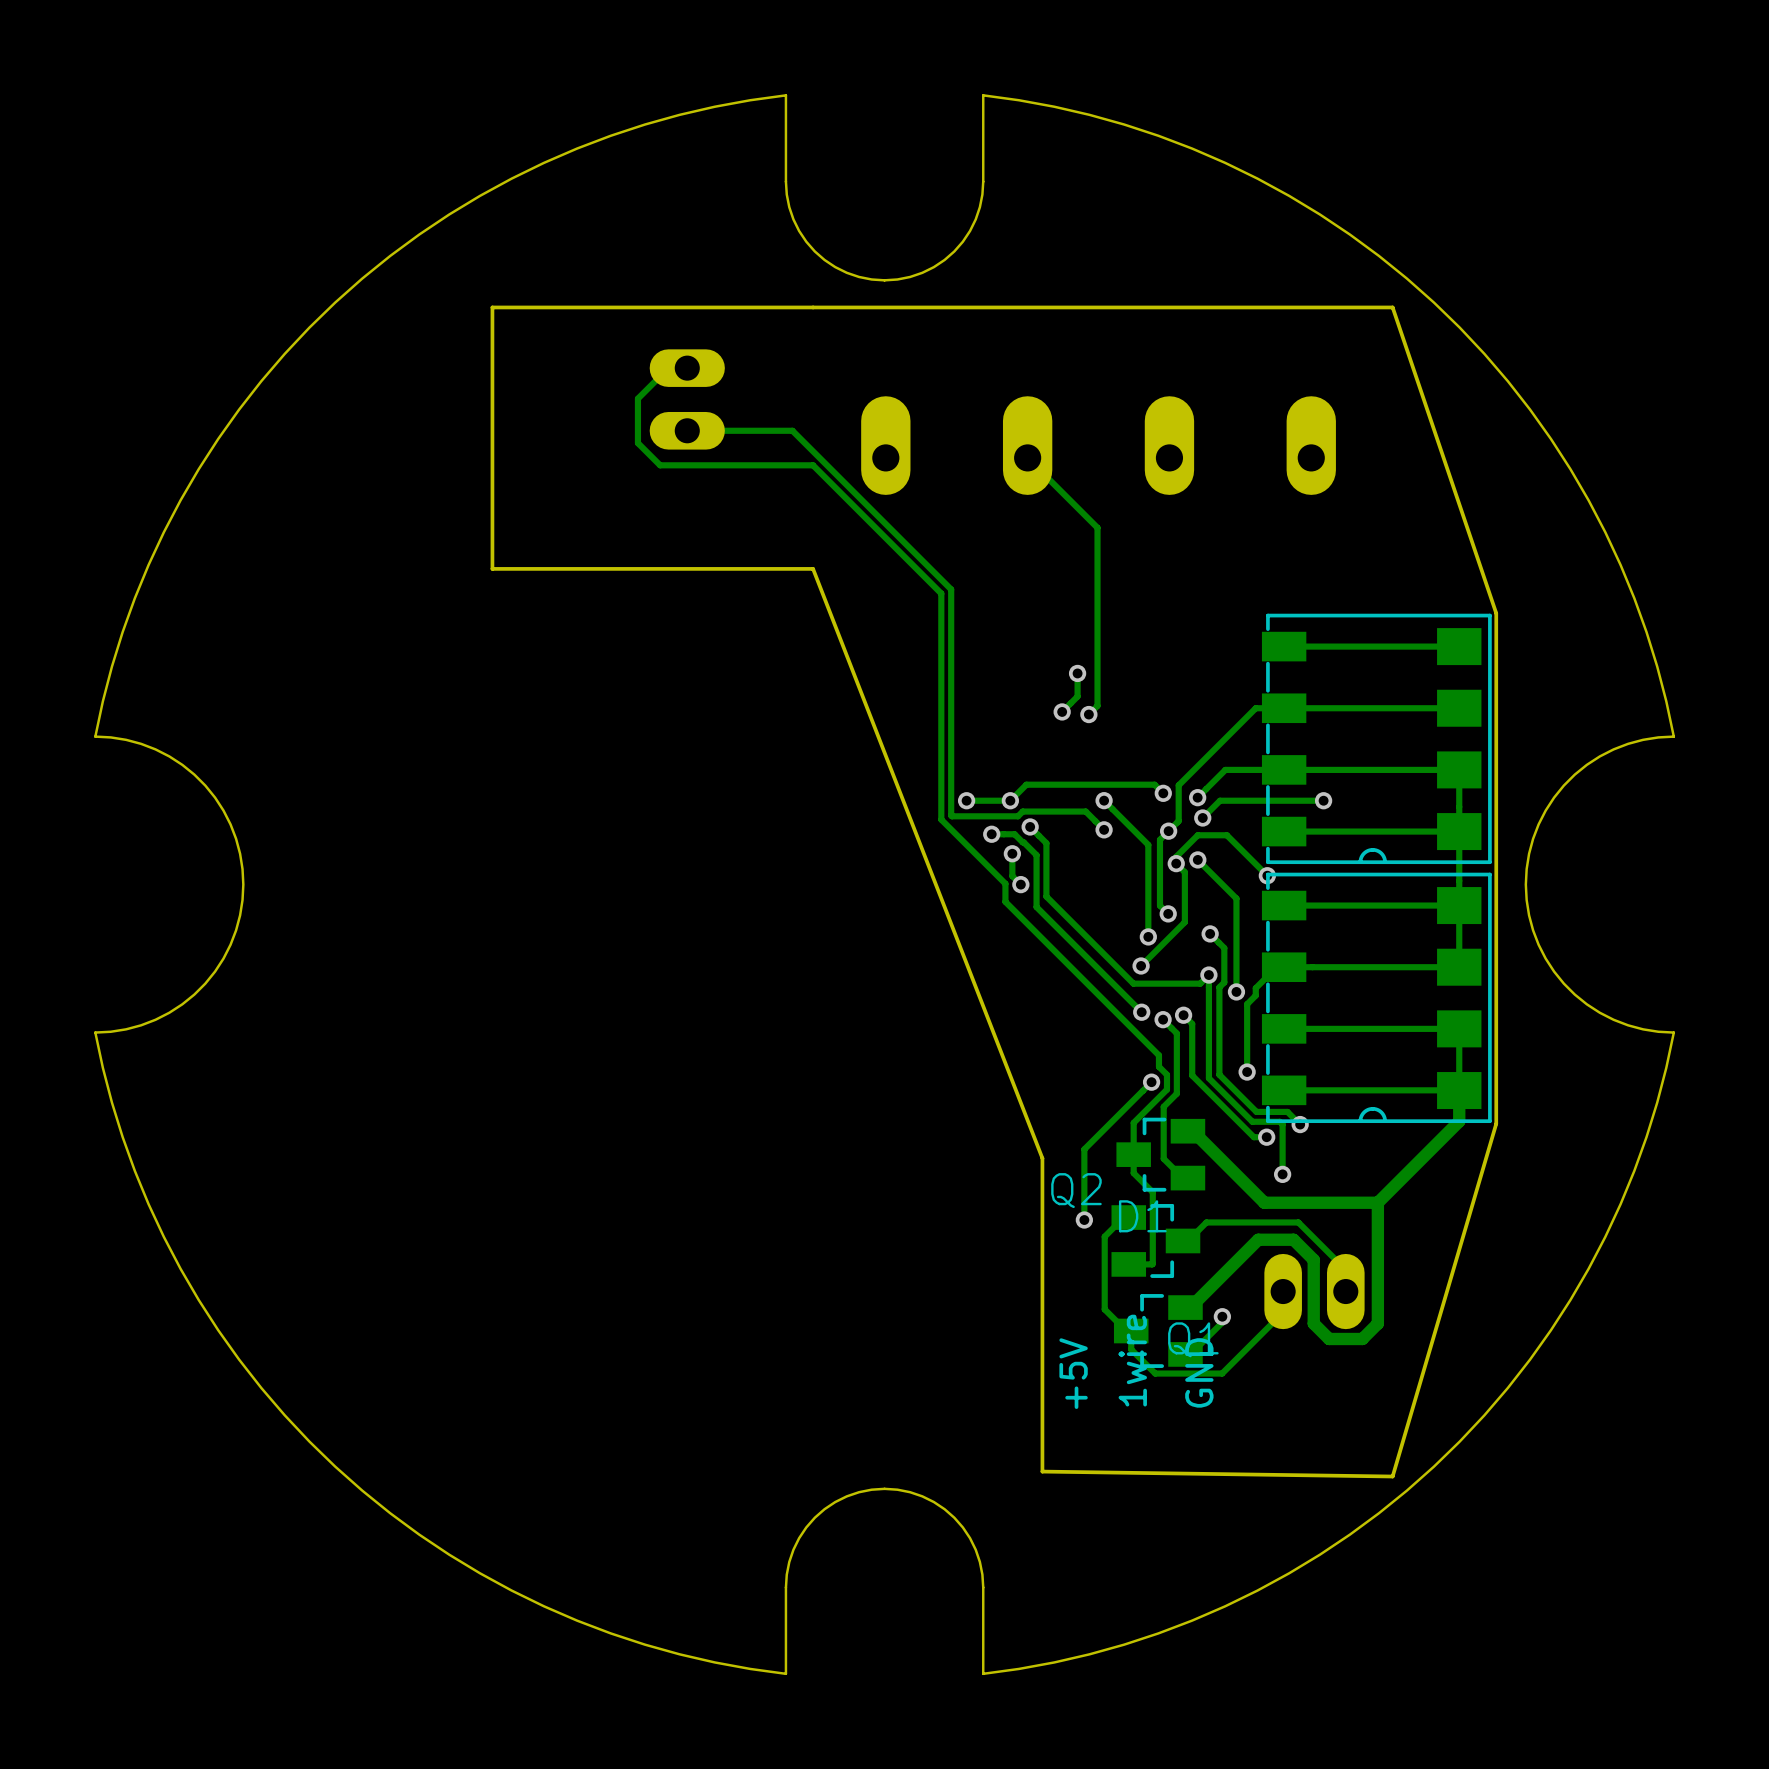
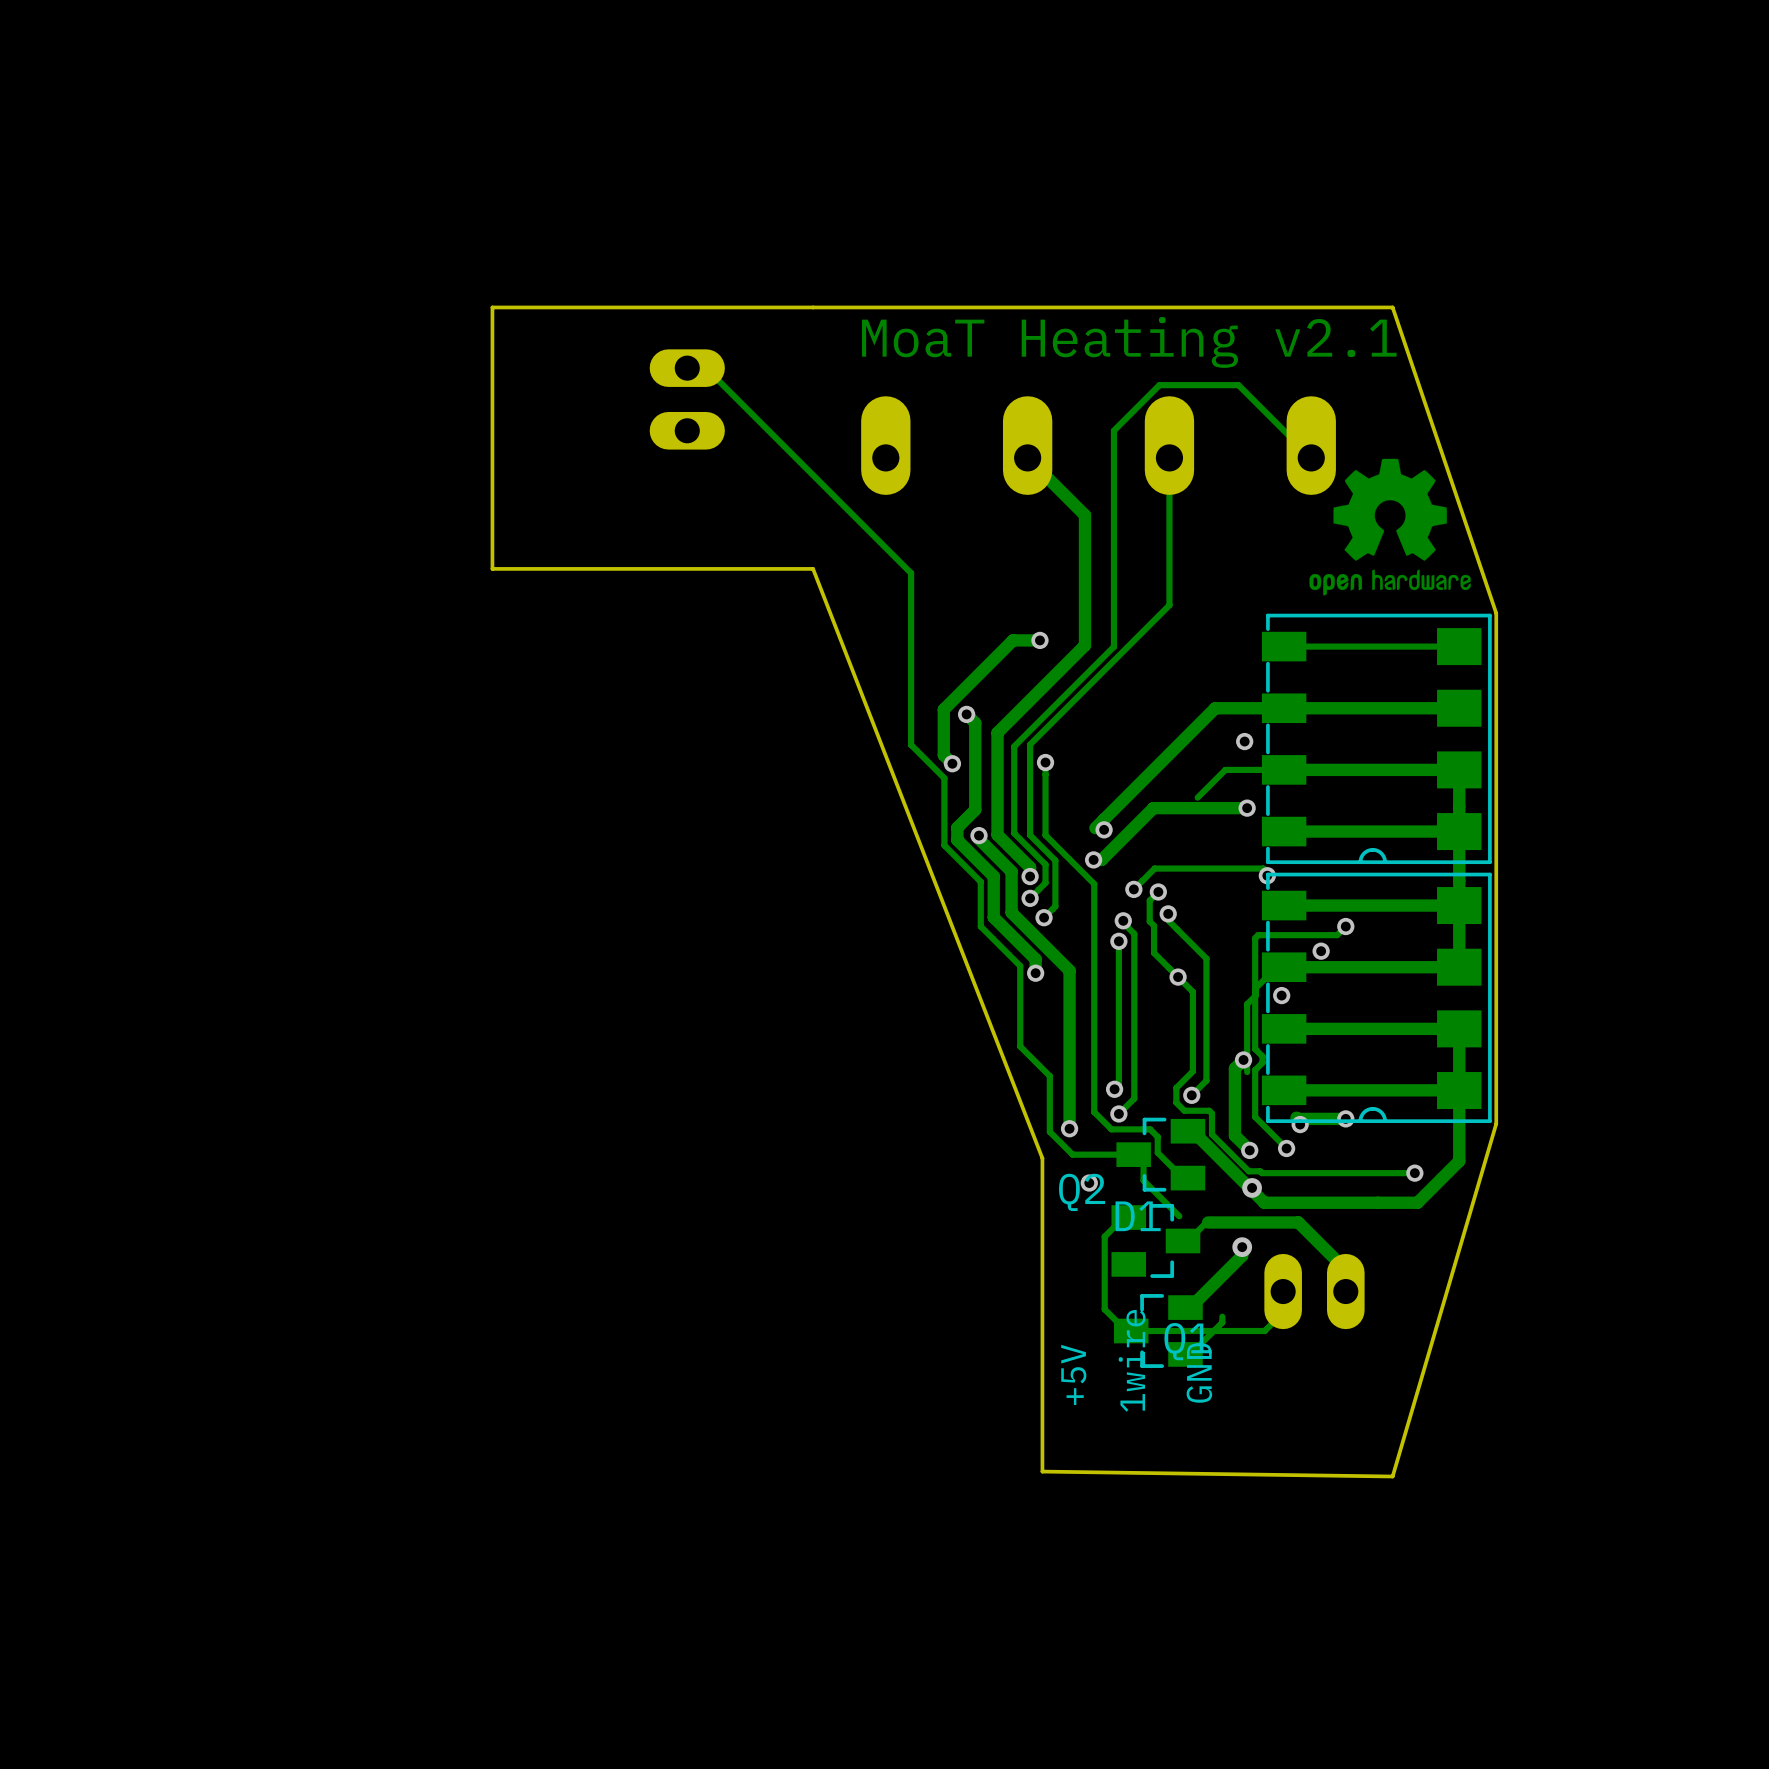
drawing: [94, 94, 1676, 1676] -> none
text: none -> MoaT Heating v2.1 (1129, 342)
track: (687, 368) (668, 368) (637, 398) (637, 443) (660, 465) (813, 465) (941, 593) (941, 819) (1005, 883) (1005, 901) (1158, 1055) (1158, 1066) (1166, 1074) (1166, 1089) (1133, 1122) (1133, 1173) (1152, 1192) (1152, 1263) (1128, 1264) -> (687, 368) (706, 368) (911, 573) (911, 744) (944, 778) (944, 845) (980, 881) (980, 926) (1020, 965) (1020, 1046) (1049, 1076) (1049, 1131) (1072, 1154) (1133, 1154) (1143, 1164) (1143, 1180) (1179, 1216)
track: (687, 430) (792, 430) (951, 589) (951, 816) (1018, 816) (1022, 811) (1085, 811) (1104, 829) -> none
track width: thin (1027, 457) (1084, 515) -> thick (1027, 457) (1084, 515)
track: none -> (1169, 457) (1169, 605) (1030, 744) (1030, 835) (1055, 860) (1055, 906) (1044, 917)
track: none -> (1311, 457) (1238, 385) (1159, 385) (1113, 430) (1113, 646) (1014, 746) (1014, 833) (1045, 864) (1045, 882) (1030, 898)
drawing: none -> [1309, 458, 1471, 596]
track: (1084, 515) (1097, 527) (1097, 705) (1088, 714) -> (1084, 515) (1084, 645) (997, 732) (997, 834) (1030, 867) (1030, 876)
track: none -> (1039, 640) (1012, 640) (943, 709) (943, 755) (952, 763)
via: none -> (1039, 640)
track: (1077, 673) (1077, 696) (1062, 711) -> none
via: (1077, 673) -> none
track: (1255, 708) (1178, 785) (1178, 821) (1159, 839) (1159, 905) (1168, 913) -> (1255, 708) (1215, 708) (1095, 828)
track width: thin (1459, 708) (1255, 708) -> thick (1459, 708) (1255, 708)
via: (1062, 711) -> none
track: none -> (966, 714) (975, 723) (975, 809) (957, 827) (957, 840) (993, 876) (993, 917) (1035, 959) (1035, 973)
via: none -> (966, 714)
via: (1088, 714) -> none
via: none -> (1244, 741)
via: none -> (1045, 762)
via: none -> (952, 763)
track width: thin (1276, 769) (1459, 769) (1459, 967) (1284, 967) -> thick (1276, 769) (1459, 769) (1459, 967) (1284, 967)
track: (1163, 793) (1154, 784) (1026, 784) (1010, 800) (966, 800) -> none
via: (1163, 793) -> none
via: (1197, 797) -> none
via: (966, 800) -> none
via: (1010, 800) -> none
track: (1104, 800) (1148, 844) (1148, 936) -> none
via: (1104, 800) -> none
track: (1323, 800) (1220, 800) (1202, 818) -> none
via: (1323, 800) -> none
track: none -> (1247, 808) (1153, 808) (1101, 859) (1093, 859)
via: none -> (1247, 808)
via: (1202, 818) -> none
track: (1030, 826) (1046, 843) (1046, 896) (1133, 983) (1200, 983) (1208, 975) (1208, 1078) (1252, 1121) (1279, 1121) (1282, 1124) (1282, 1174) -> none
via: (1030, 826) -> none
via: (1168, 831) -> none
track width: thin (1459, 831) (1284, 831) -> thick (1459, 831) (1284, 831)
track: (991, 834) (1014, 834) (1036, 855) (1036, 907) (1141, 1012) -> none
via position: (991, 834) -> (979, 835)
track: none -> (979, 835) (979, 839) (1011, 871) (1011, 912) (1069, 970) (1069, 1128)
track: (1012, 853) (1012, 876) (1020, 884) -> none
via: (1012, 853) -> none
via: none -> (1093, 859)
track: (1197, 859) (1236, 898) (1236, 991) -> none
via: (1197, 859) -> none
via: (1176, 863) -> none
track: (1267, 875) (1226, 835) (1197, 835) (1176, 856) (1176, 863) (1184, 872) (1184, 922) (1141, 965) -> none
via: none -> (1030, 876)
track: none -> (1271, 877) (1263, 868) (1154, 868) (1133, 889)
via: (1020, 884) -> none
via: none -> (1133, 889)
track: none -> (1158, 891) (1149, 900) (1149, 921) (1154, 925) (1154, 953) (1192, 991) (1192, 1071) (1176, 1087) (1176, 1102) (1184, 1110) (1209, 1110) (1212, 1113) (1212, 1134) (1248, 1171) (1260, 1171) (1261, 1173) (1414, 1173)
via: none -> (1158, 891)
via: none -> (1030, 898)
track width: thin (1459, 905) (1284, 905) -> thick (1459, 905) (1284, 905)
via: none -> (1044, 917)
track: none -> (1123, 920) (1134, 933) (1134, 1098) (1118, 1113)
via: none -> (1123, 920)
track: none -> (1168, 920) (1206, 958) (1206, 1080) (1191, 1095)
track: none -> (1345, 926) (1337, 935) (1258, 935) (1255, 938) (1255, 1049) (1262, 1056) (1262, 1062) (1255, 1070) (1255, 1117) (1286, 1148)
via: none -> (1345, 926)
track: (1210, 933) (1224, 948) (1224, 982) (1219, 987) (1219, 1074) (1256, 1111) (1287, 1111) (1300, 1124) -> none
via: (1210, 933) -> none
via: (1148, 936) -> none
track: none -> (1118, 941) (1118, 1084) (1114, 1089)
via: none -> (1118, 941)
via: none -> (1321, 951)
via: (1141, 965) -> none
via: none -> (1035, 973)
via: (1208, 975) -> none
via: none -> (1178, 977)
via: (1236, 991) -> none
via: none -> (1281, 995)
via: (1141, 1012) -> none
track: (1183, 1015) (1192, 1023) (1192, 1075) (1253, 1137) (1266, 1137) -> none
via: (1183, 1015) -> none
track: (1163, 1019) (1176, 1033) (1176, 1093) (1163, 1106) (1163, 1158) -> (1045, 762) (1045, 835) (1094, 883) (1094, 1112) (1111, 1129) (1150, 1129) (1157, 1136) (1157, 1152) (1163, 1158)
via: (1163, 1019) -> none
track width: thin (1284, 1028) (1459, 1028) (1459, 1090) -> thick (1284, 1028) (1459, 1028) (1459, 1090)
track: none -> (1243, 1059) (1234, 1068) (1234, 1135) (1249, 1150)
via position: (1247, 1072) -> (1243, 1059)
track: (1151, 1082) (1084, 1149) (1084, 1220) -> none
via: (1151, 1082) -> none
via: none -> (1114, 1089)
track width: thin (1459, 1090) (1284, 1090) -> thick (1459, 1090) (1284, 1090)
via: none -> (1191, 1095)
via: none -> (1118, 1113)
track: none -> (1296, 1117) (1345, 1118)
via: none -> (1345, 1118)
track: (1459, 1121) (1377, 1202) (1377, 1323) (1362, 1338) (1329, 1338) (1313, 1323) (1313, 1259) (1293, 1239) (1258, 1239) (1242, 1255) -> (1459, 1121) (1459, 1161) (1417, 1202) (1377, 1202)
via: none -> (1069, 1128)
via position: (1266, 1137) -> (1249, 1150)
via: none -> (1286, 1148)
via: none -> (1414, 1173)
via: (1282, 1174) -> none
via: none -> (1252, 1187)
via position: (1084, 1220) -> (1089, 1183)
track width: thin (1208, 1222) (1298, 1222) (1348, 1272) (1348, 1291) -> thick (1208, 1222) (1298, 1222) (1348, 1272) (1348, 1291)
via: none -> (1242, 1247)
via: (1222, 1316) -> none
track: (1264, 1331) (1222, 1373) (1155, 1373) (1131, 1349) (1131, 1331) -> (1264, 1331) (1131, 1331)

